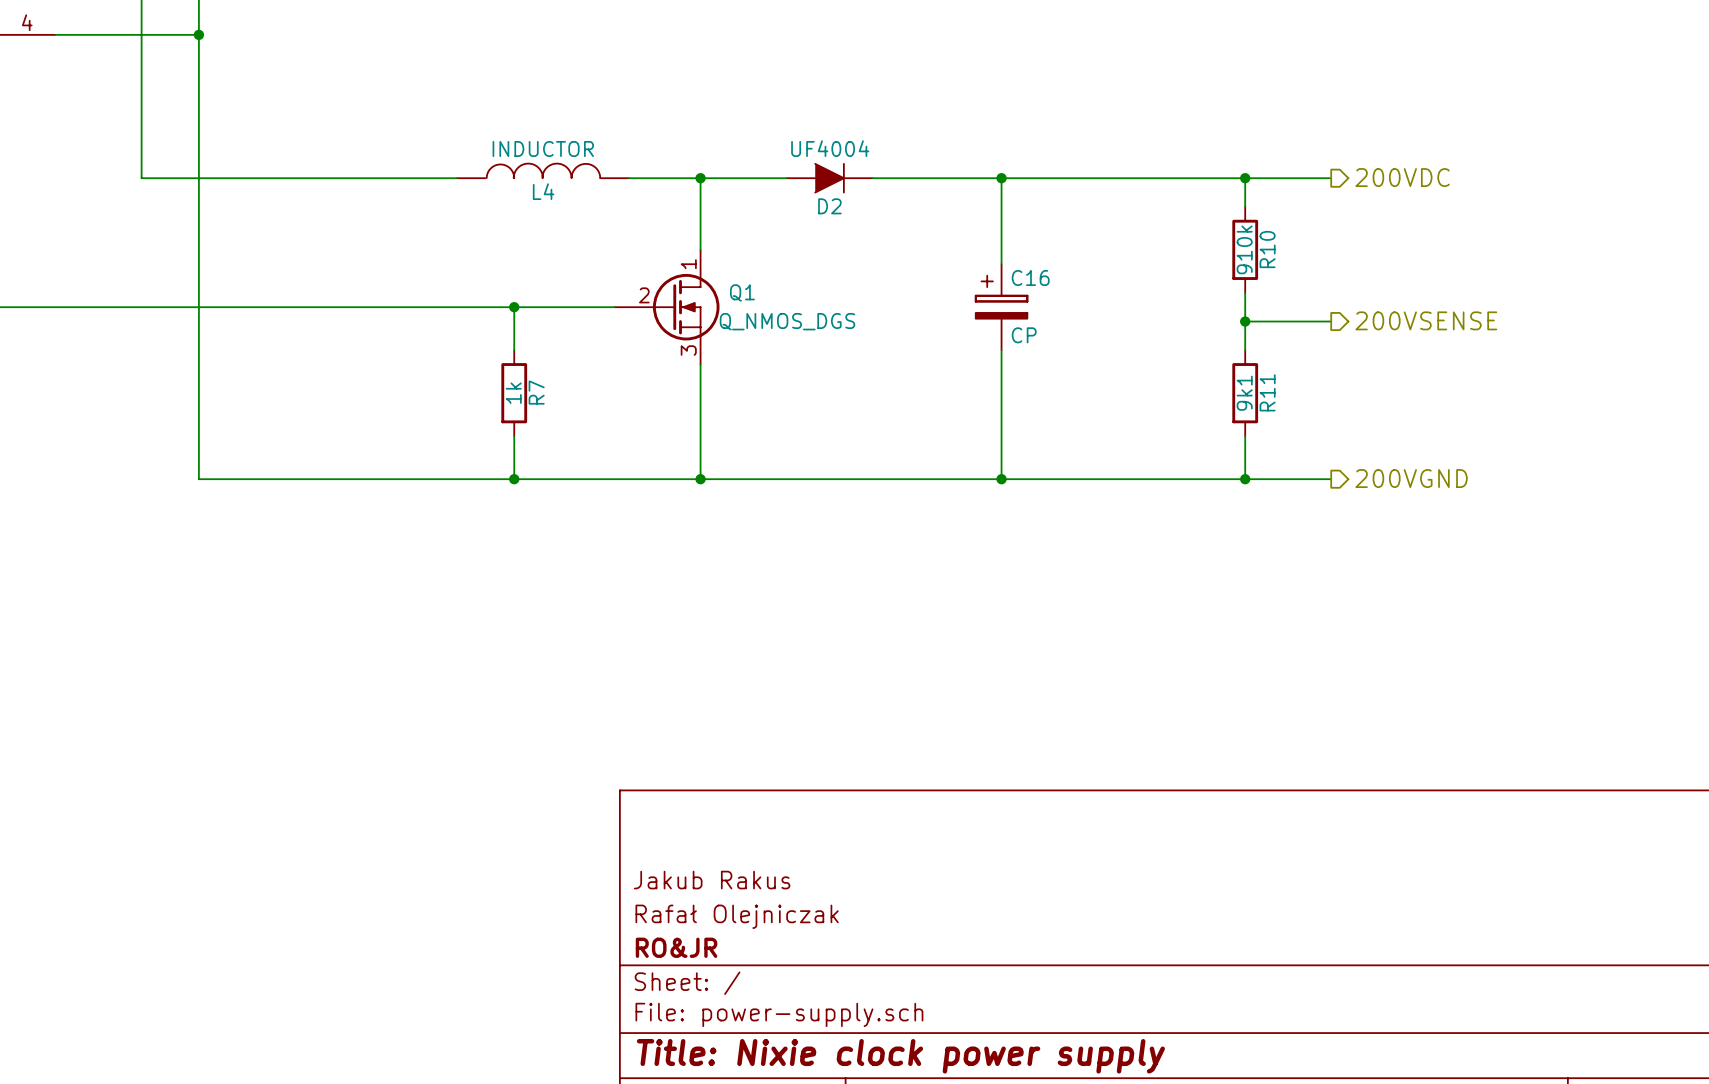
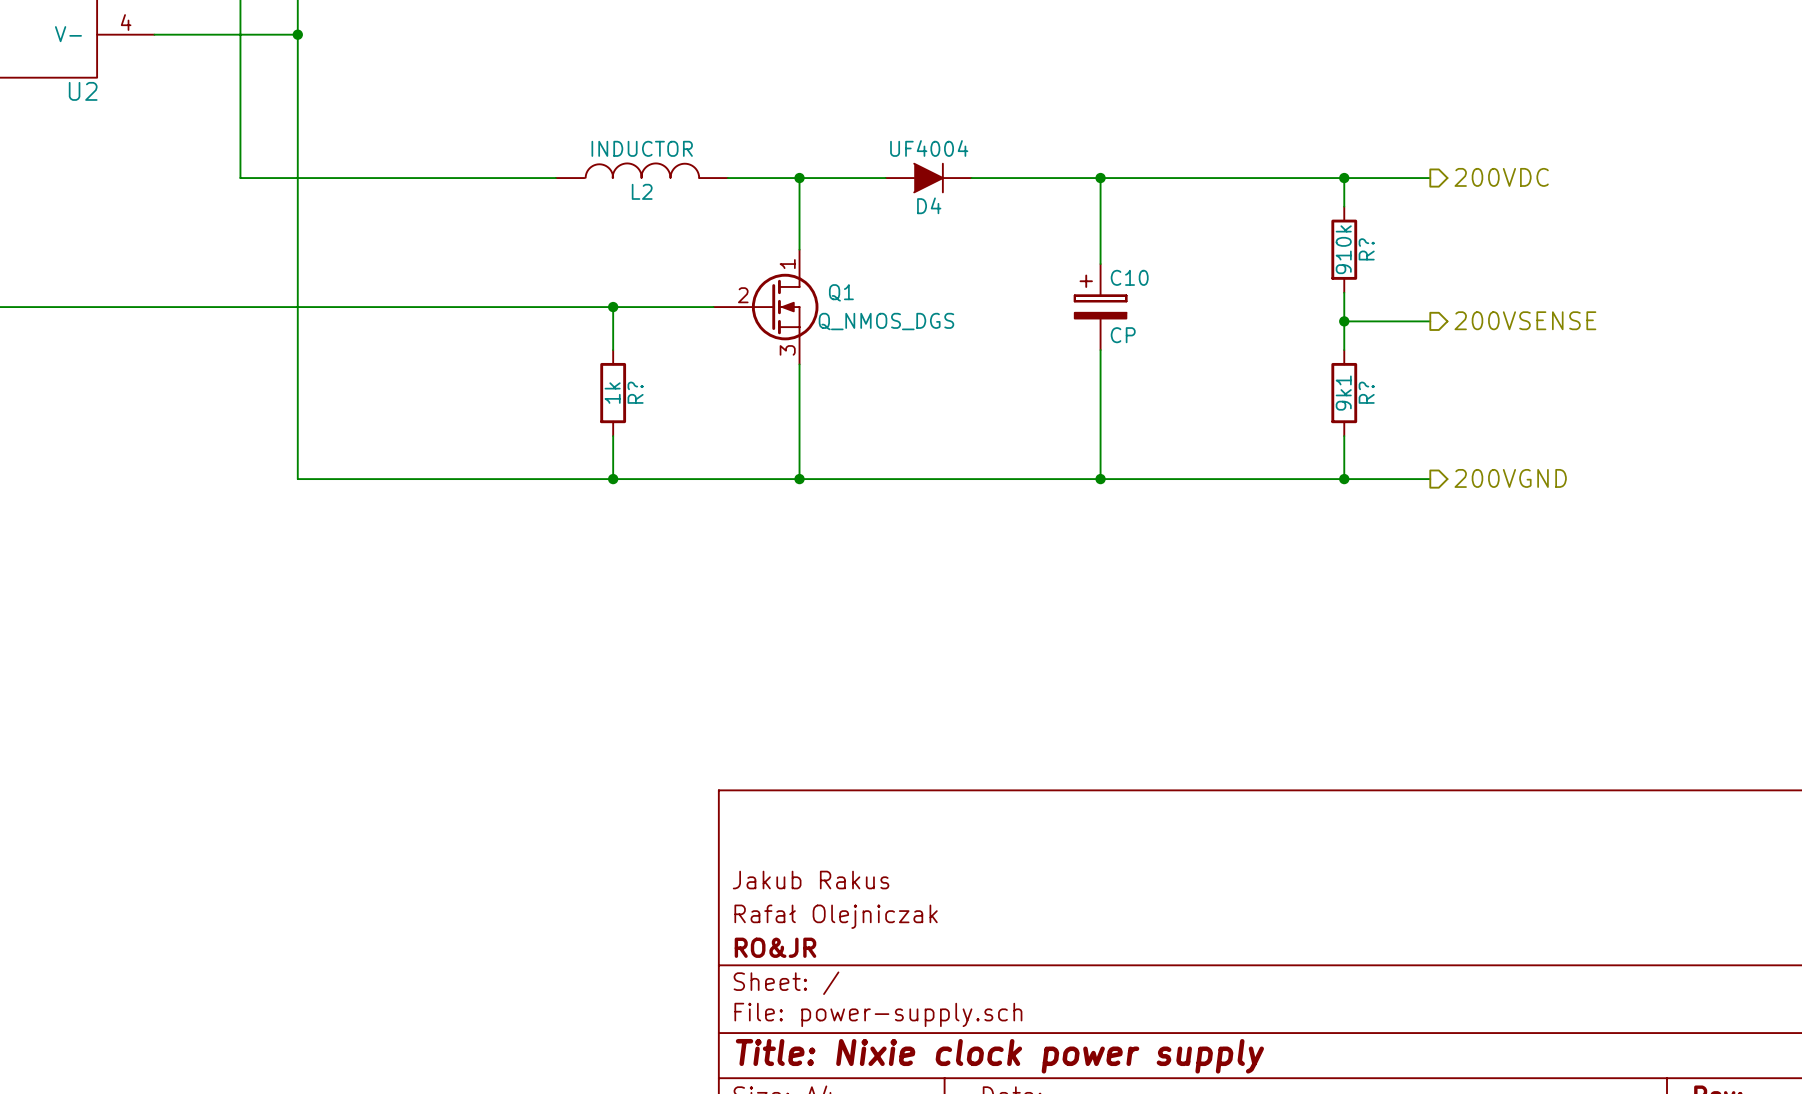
L4 name: L4 (543, 191) -> L2 (642, 191)
D2 name: D2 (829, 206) -> D4 (929, 205)
R10 name: R10 (1267, 249) -> R? (1366, 249)
C16 name: C16 (1030, 277) -> C10 (1129, 277)
R7 name: R7 (536, 392) -> R? (635, 392)
R11 name: R11 (1267, 392) -> R? (1366, 392)

